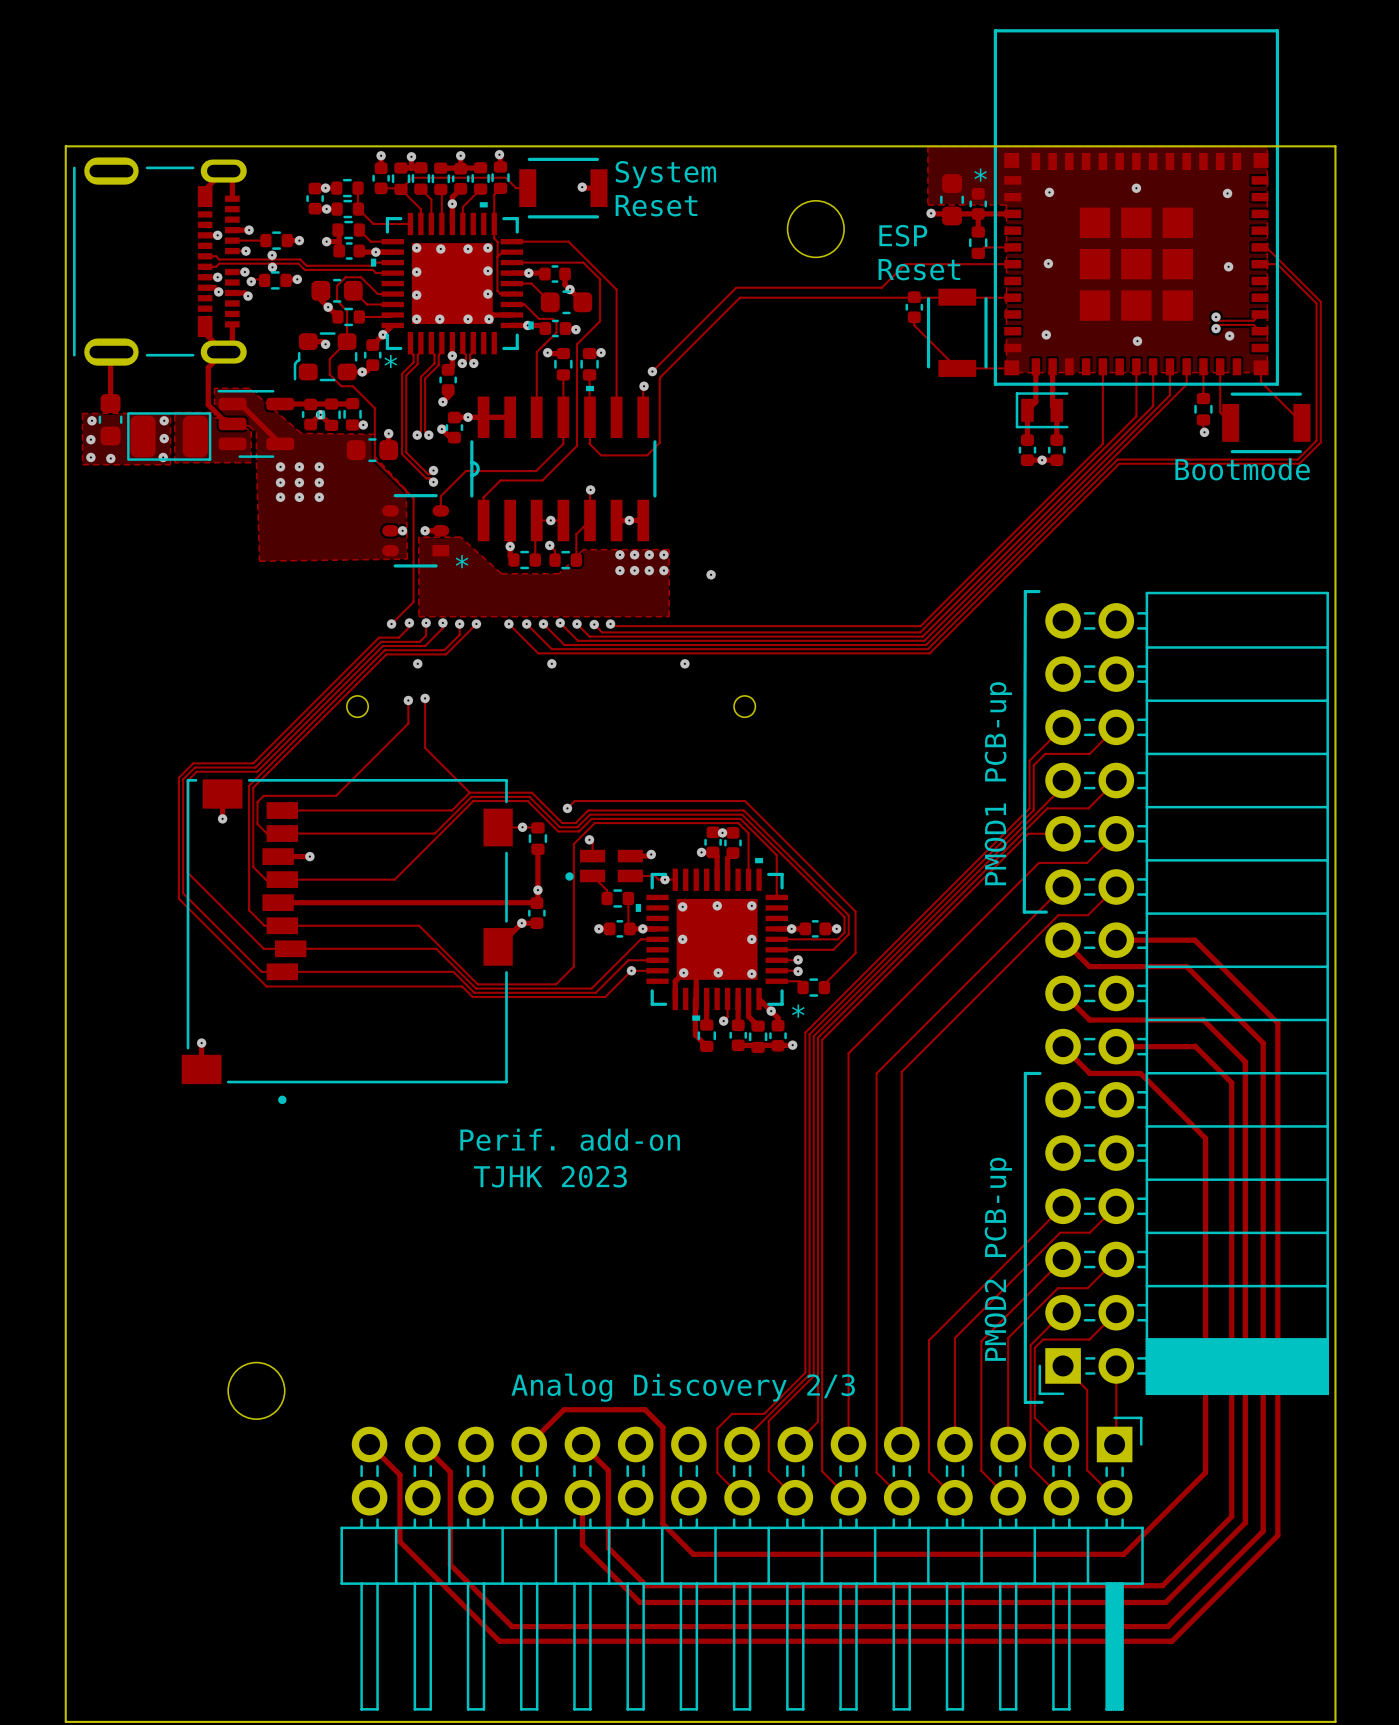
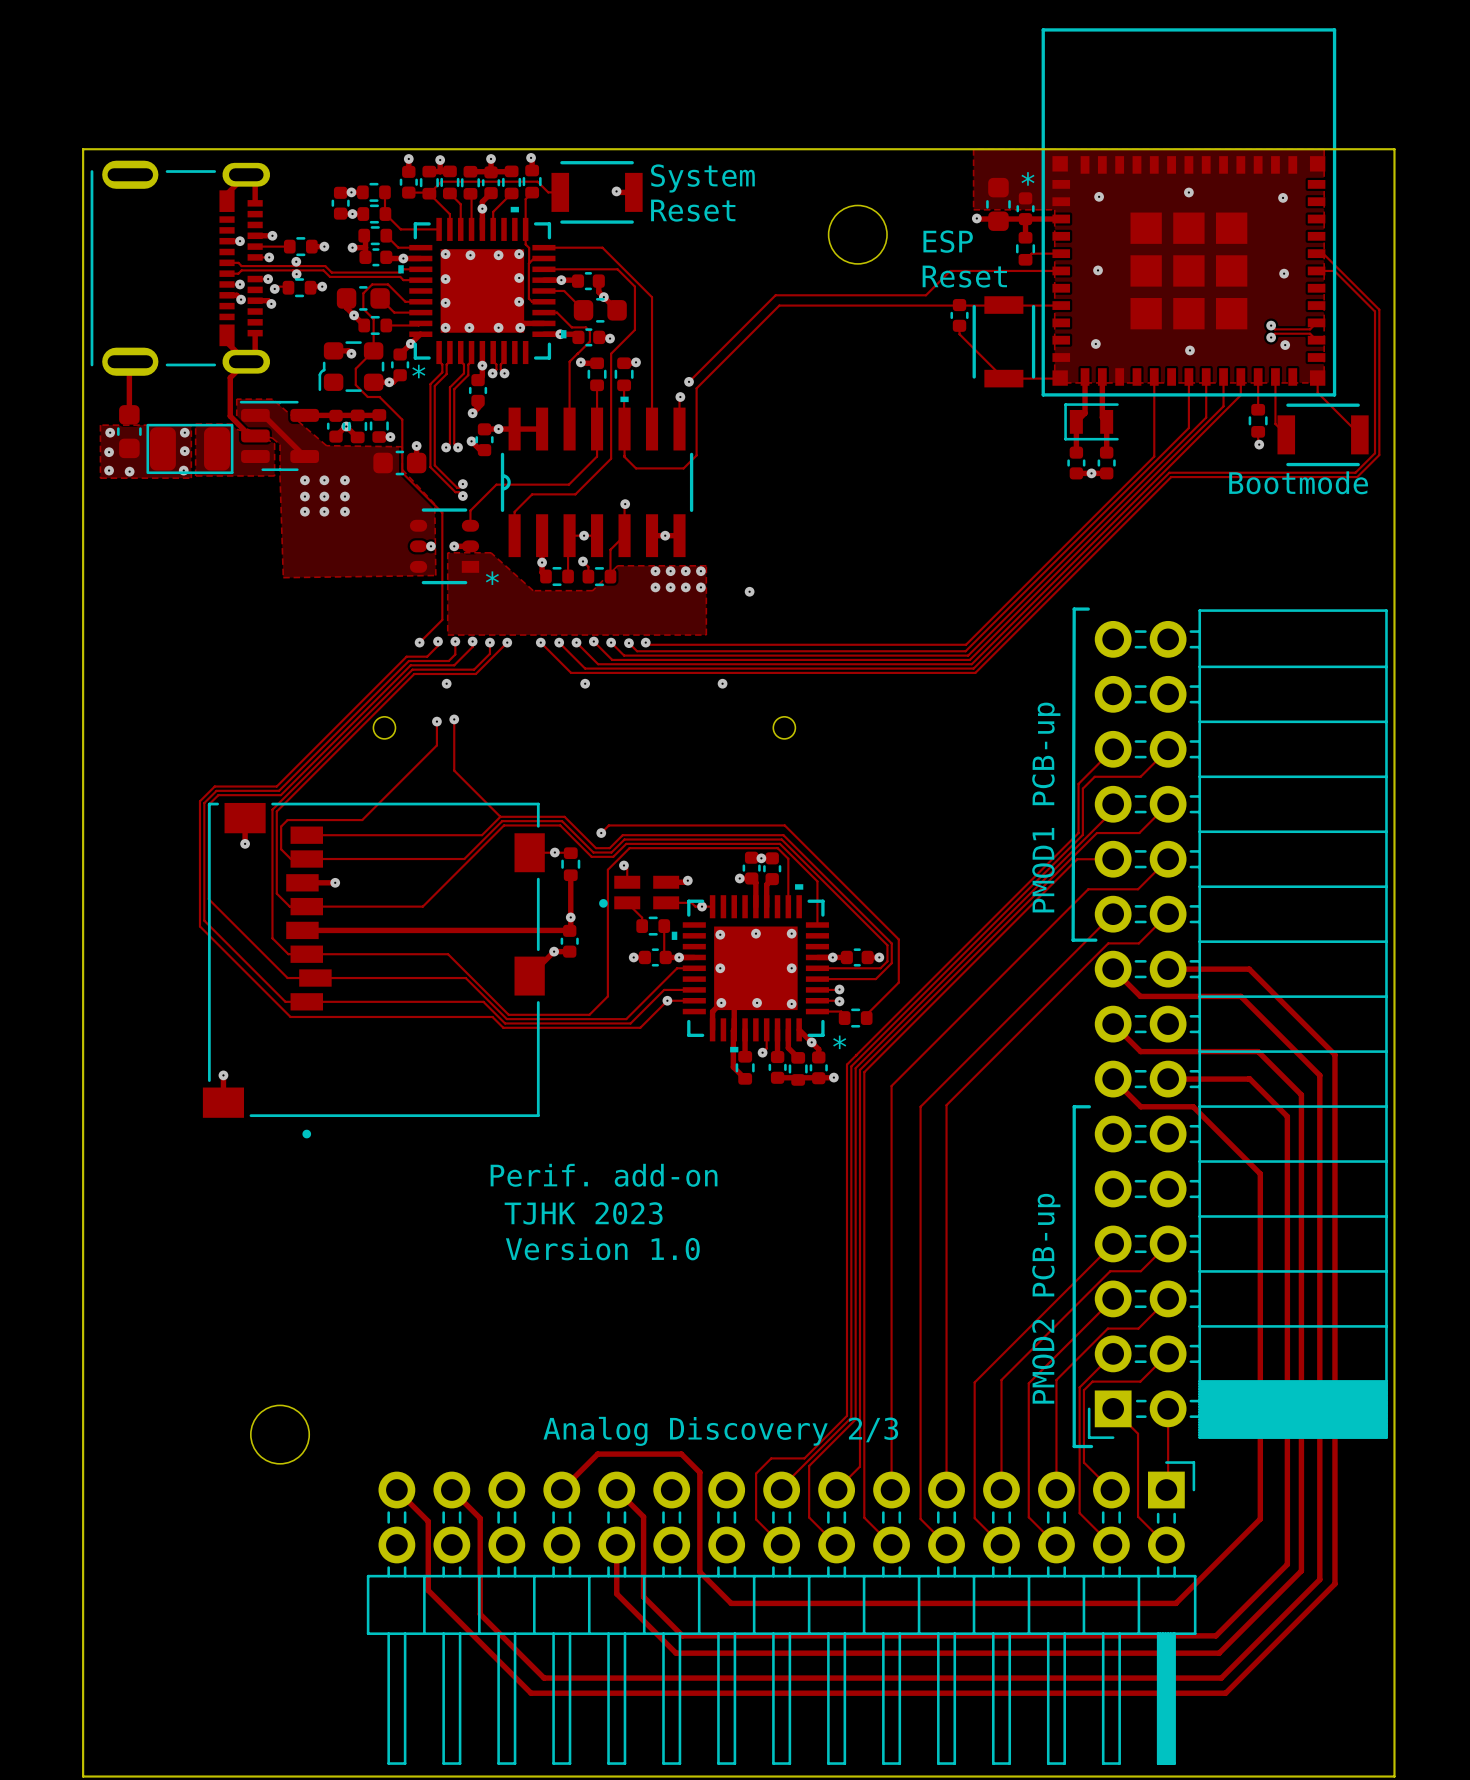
text: none -> Version 1.0 (602, 1248)

